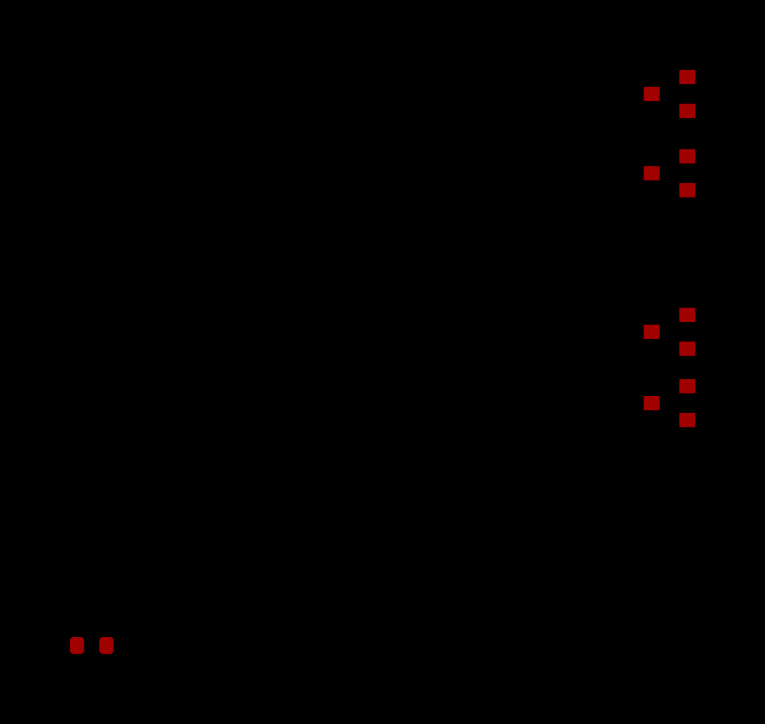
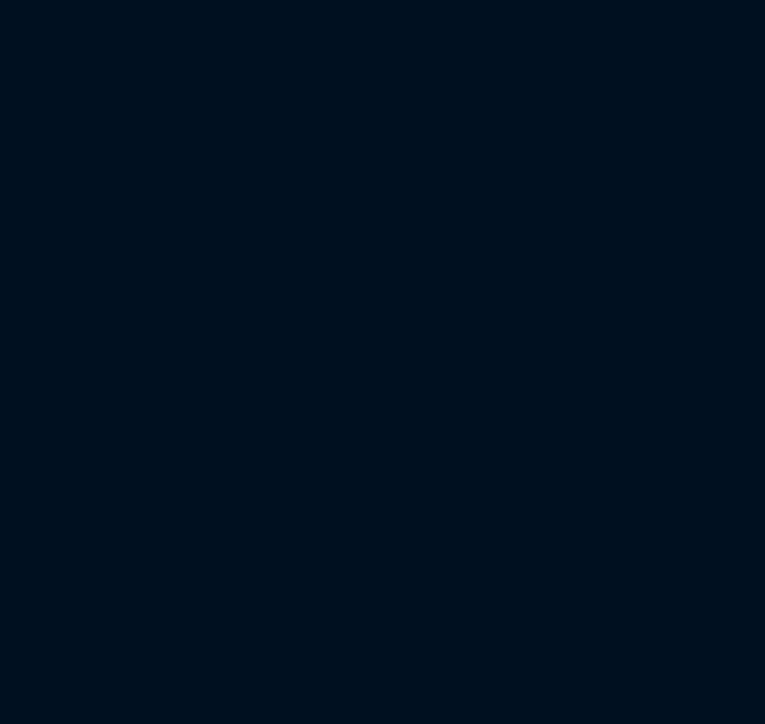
part: (669, 93) -> none
part: (669, 173) -> none
part: (669, 331) -> none
part: (669, 403) -> none
part: (91, 645) -> none

